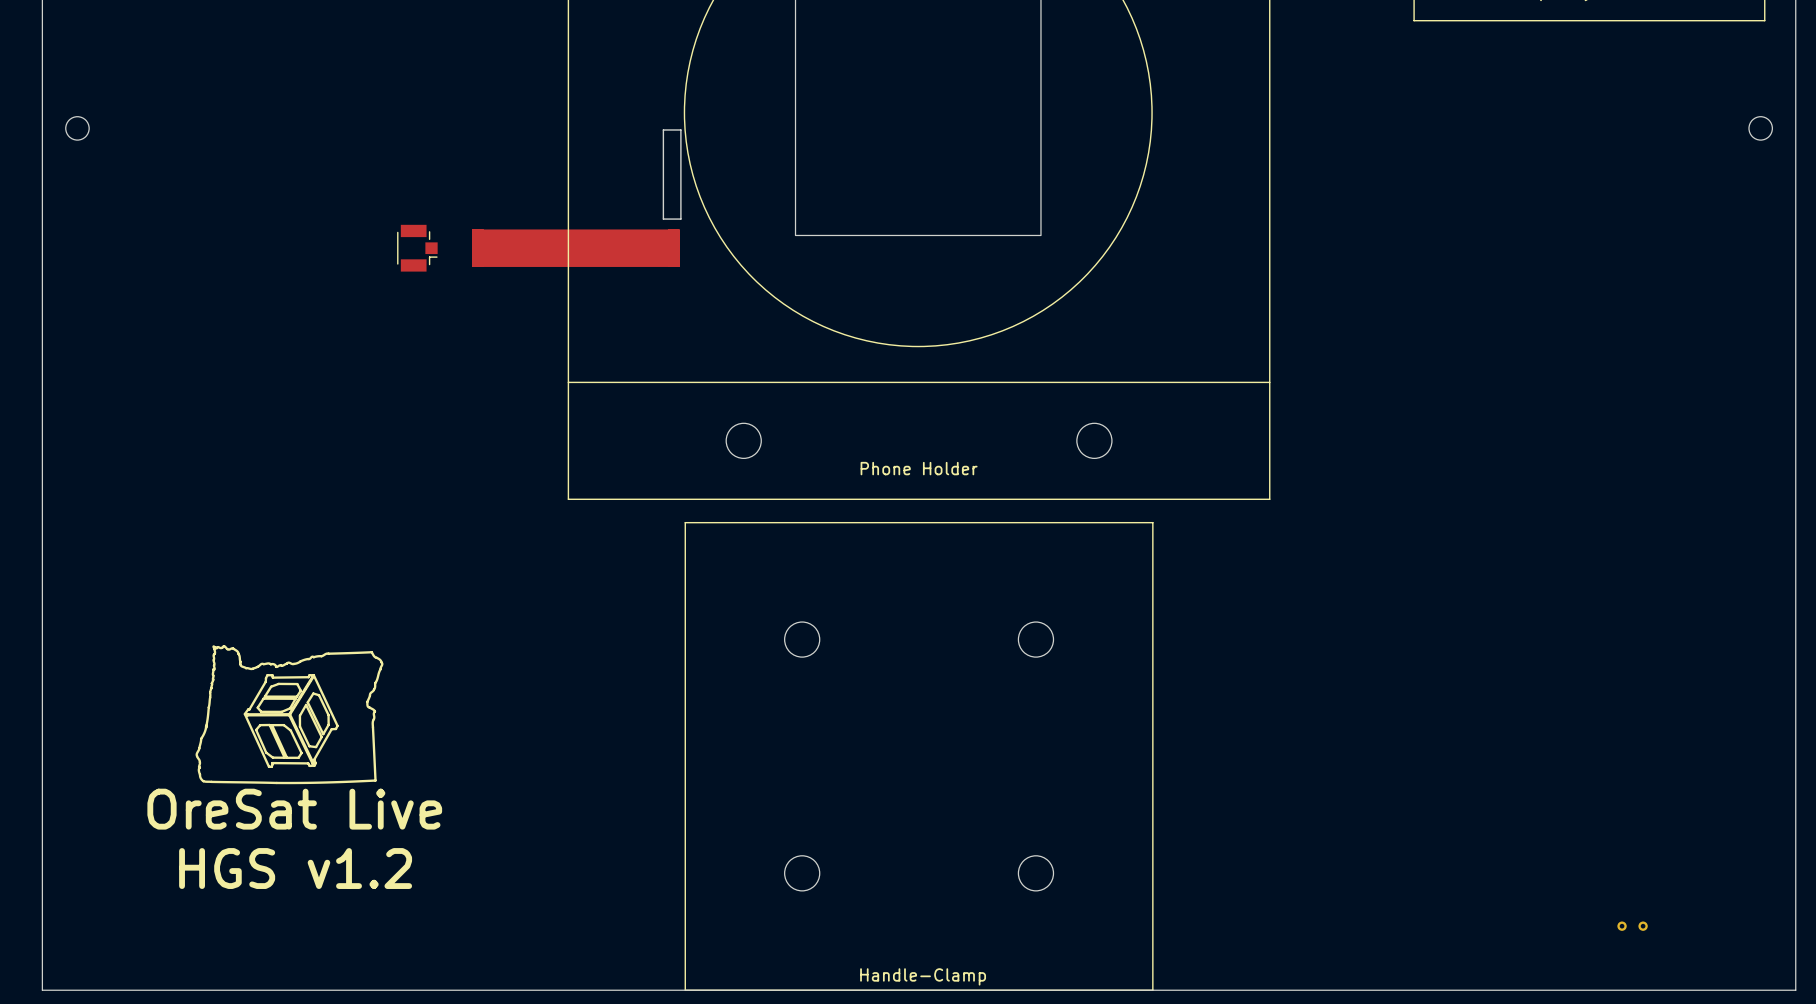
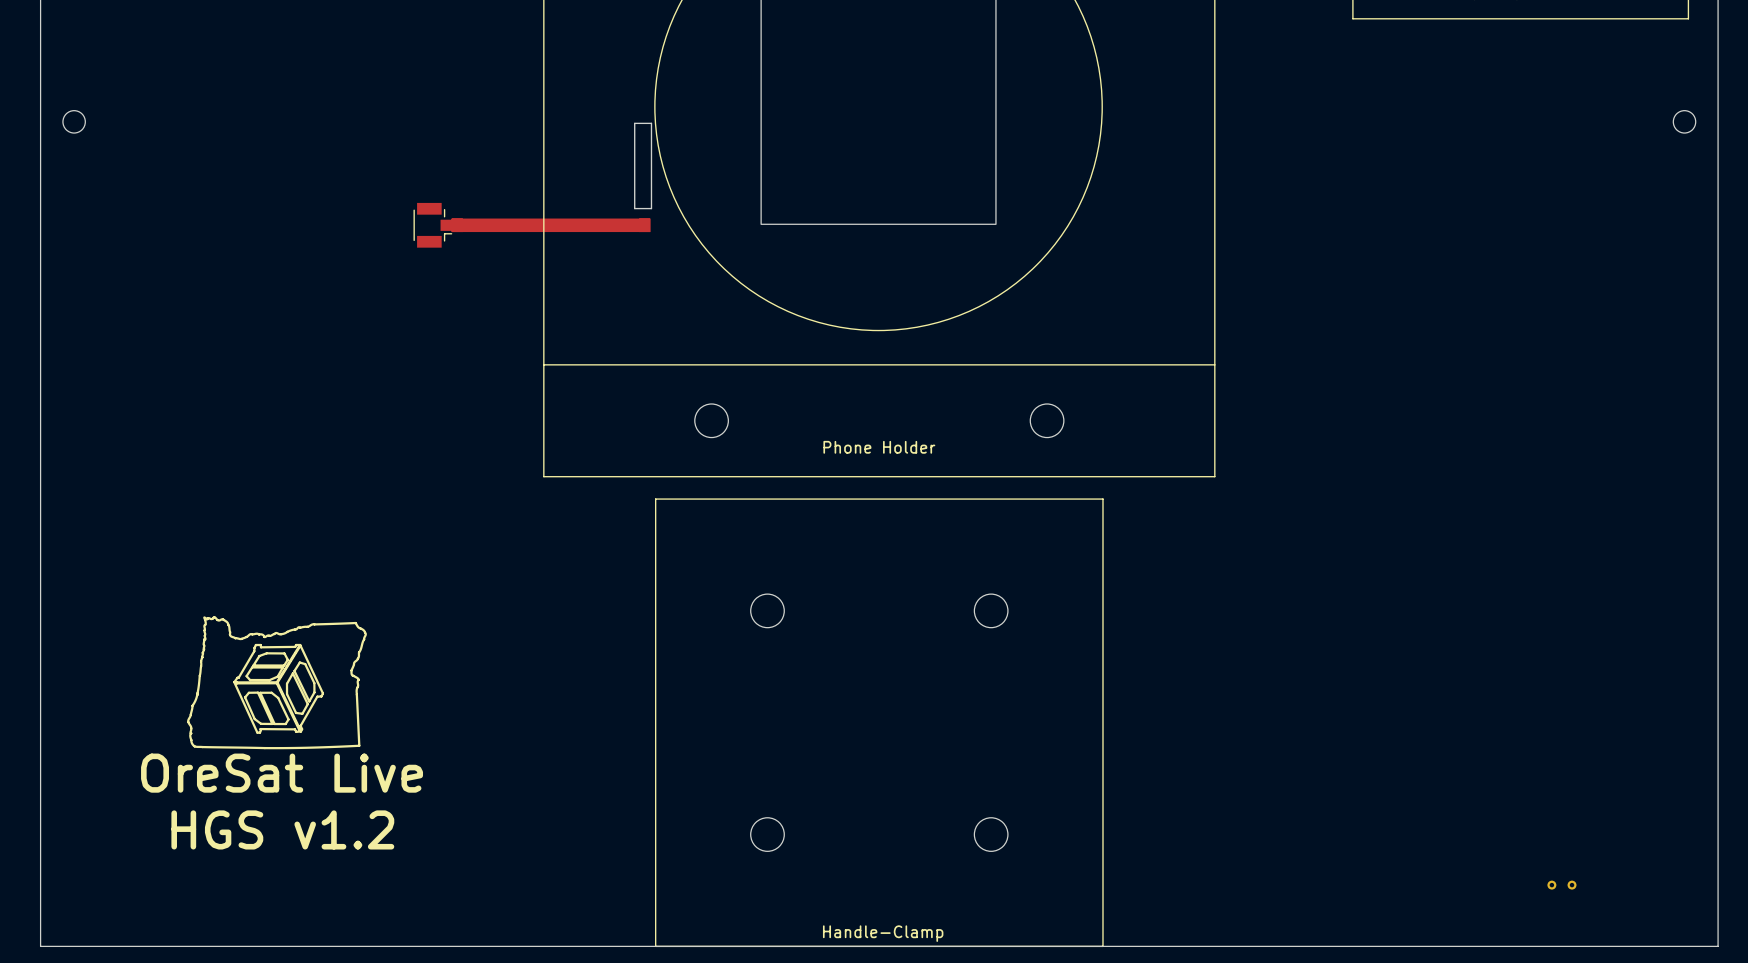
part footprint: [472, 229, 680, 267] -> [451, 218, 651, 233]
part position: (417, 248) -> (432, 225)

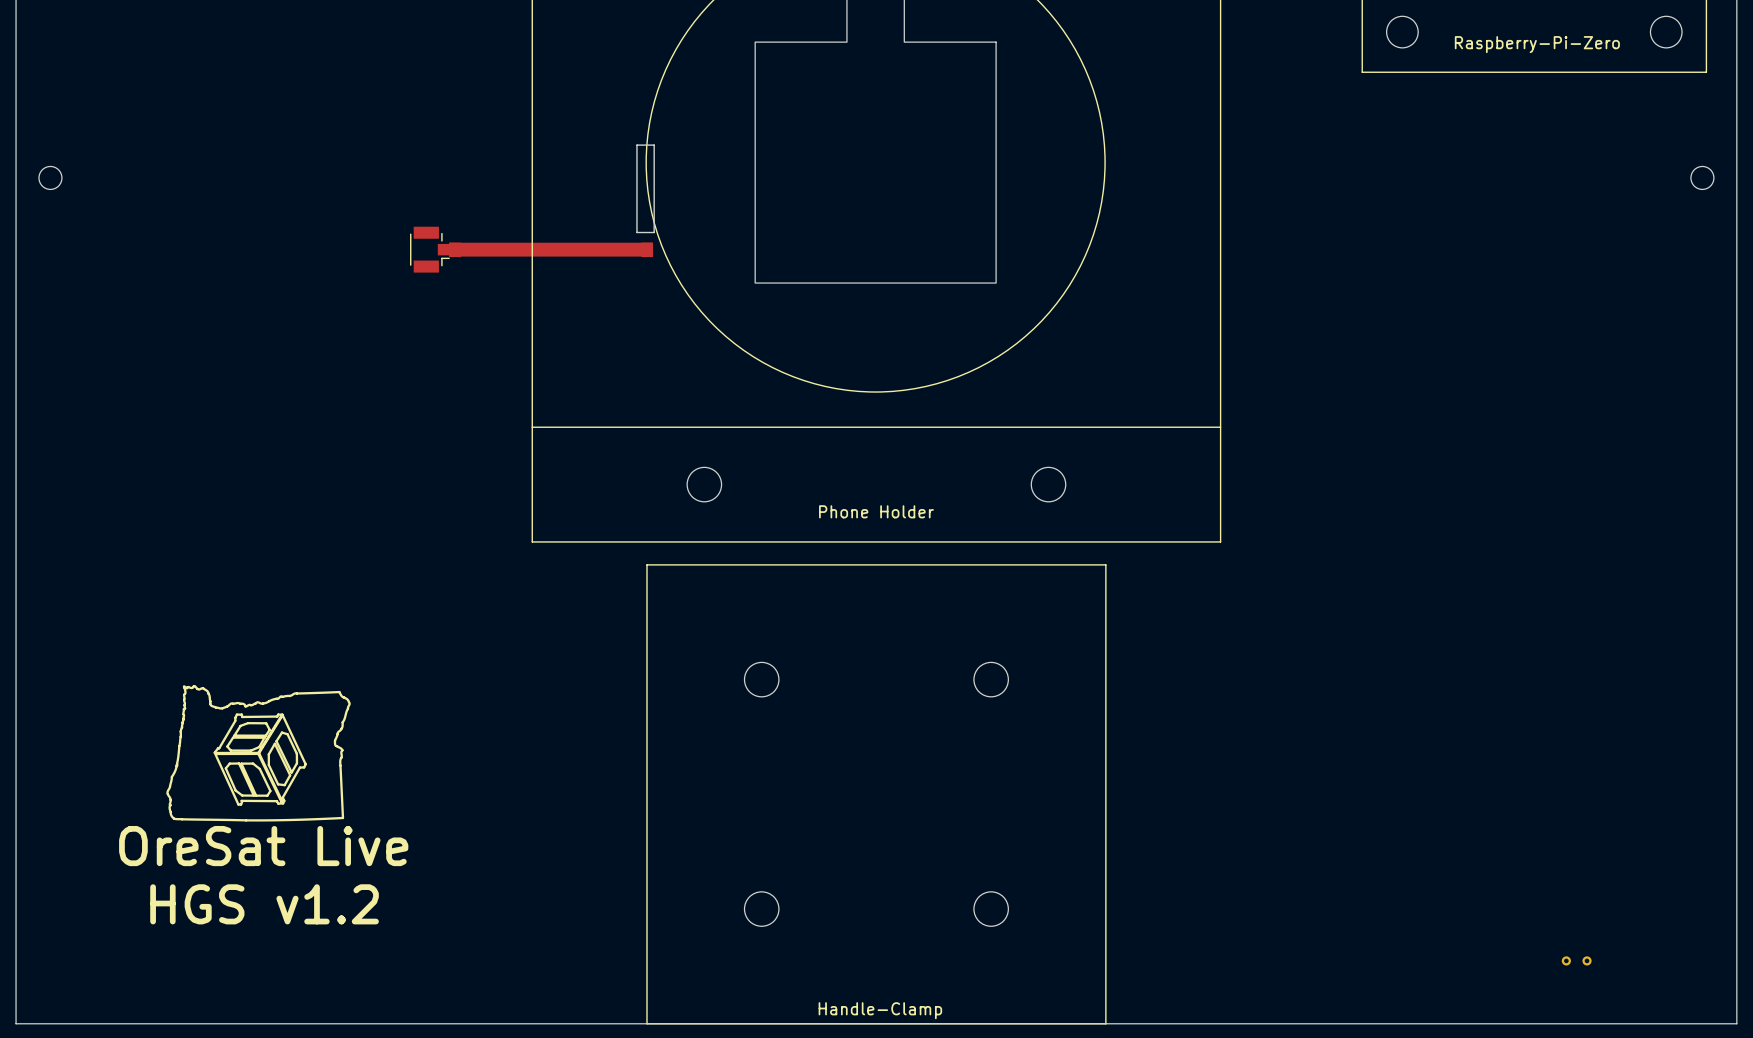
drawing position: (643, 165) -> (645, 188)
part position: (432, 225) -> (429, 249)
part position: (550, 225) -> (551, 249)

